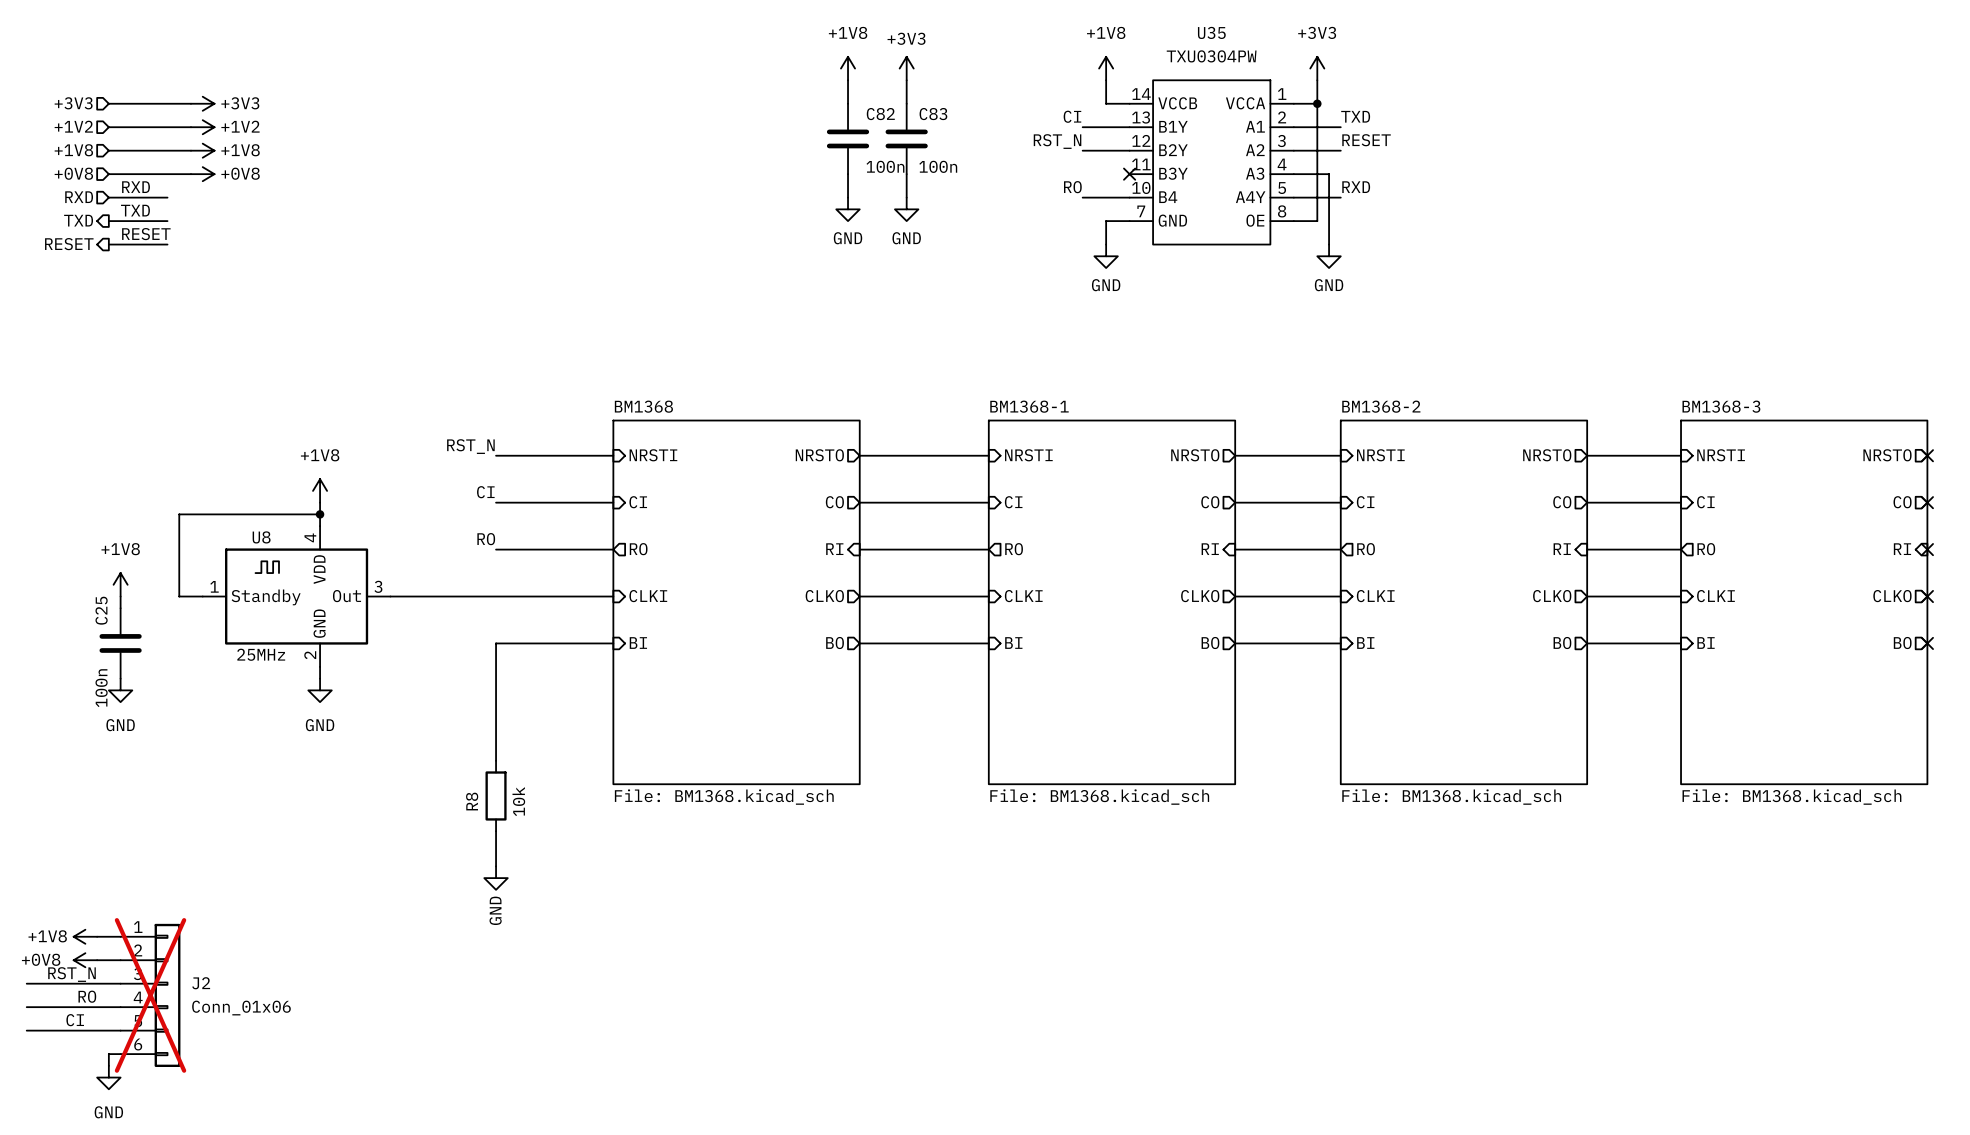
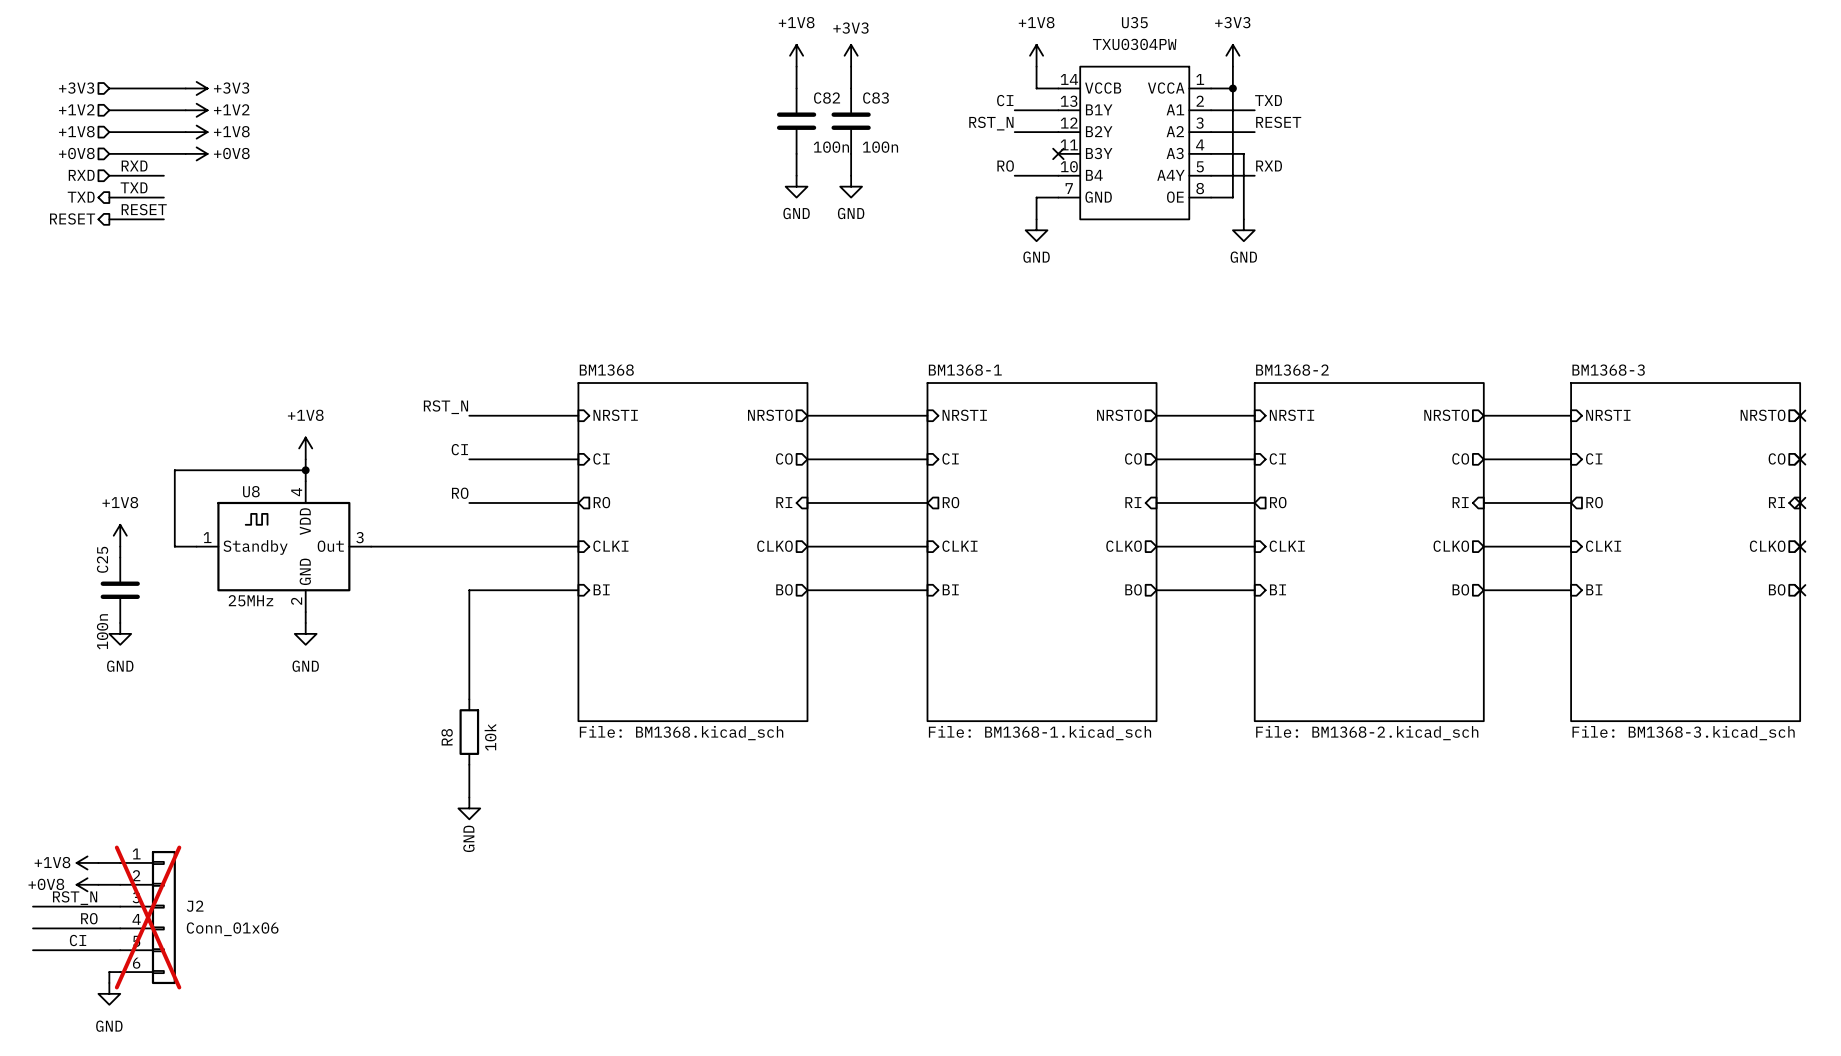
sheet BM1368-1 value: File: BM1368.kicad_sch (1099, 797) -> File: BM1368-1.kicad_sch (1039, 733)
sheet BM1368-2 value: File: BM1368.kicad_sch (1451, 797) -> File: BM1368-2.kicad_sch (1367, 733)
sheet BM1368-3 value: File: BM1368.kicad_sch (1791, 797) -> File: BM1368-3.kicad_sch (1683, 733)

